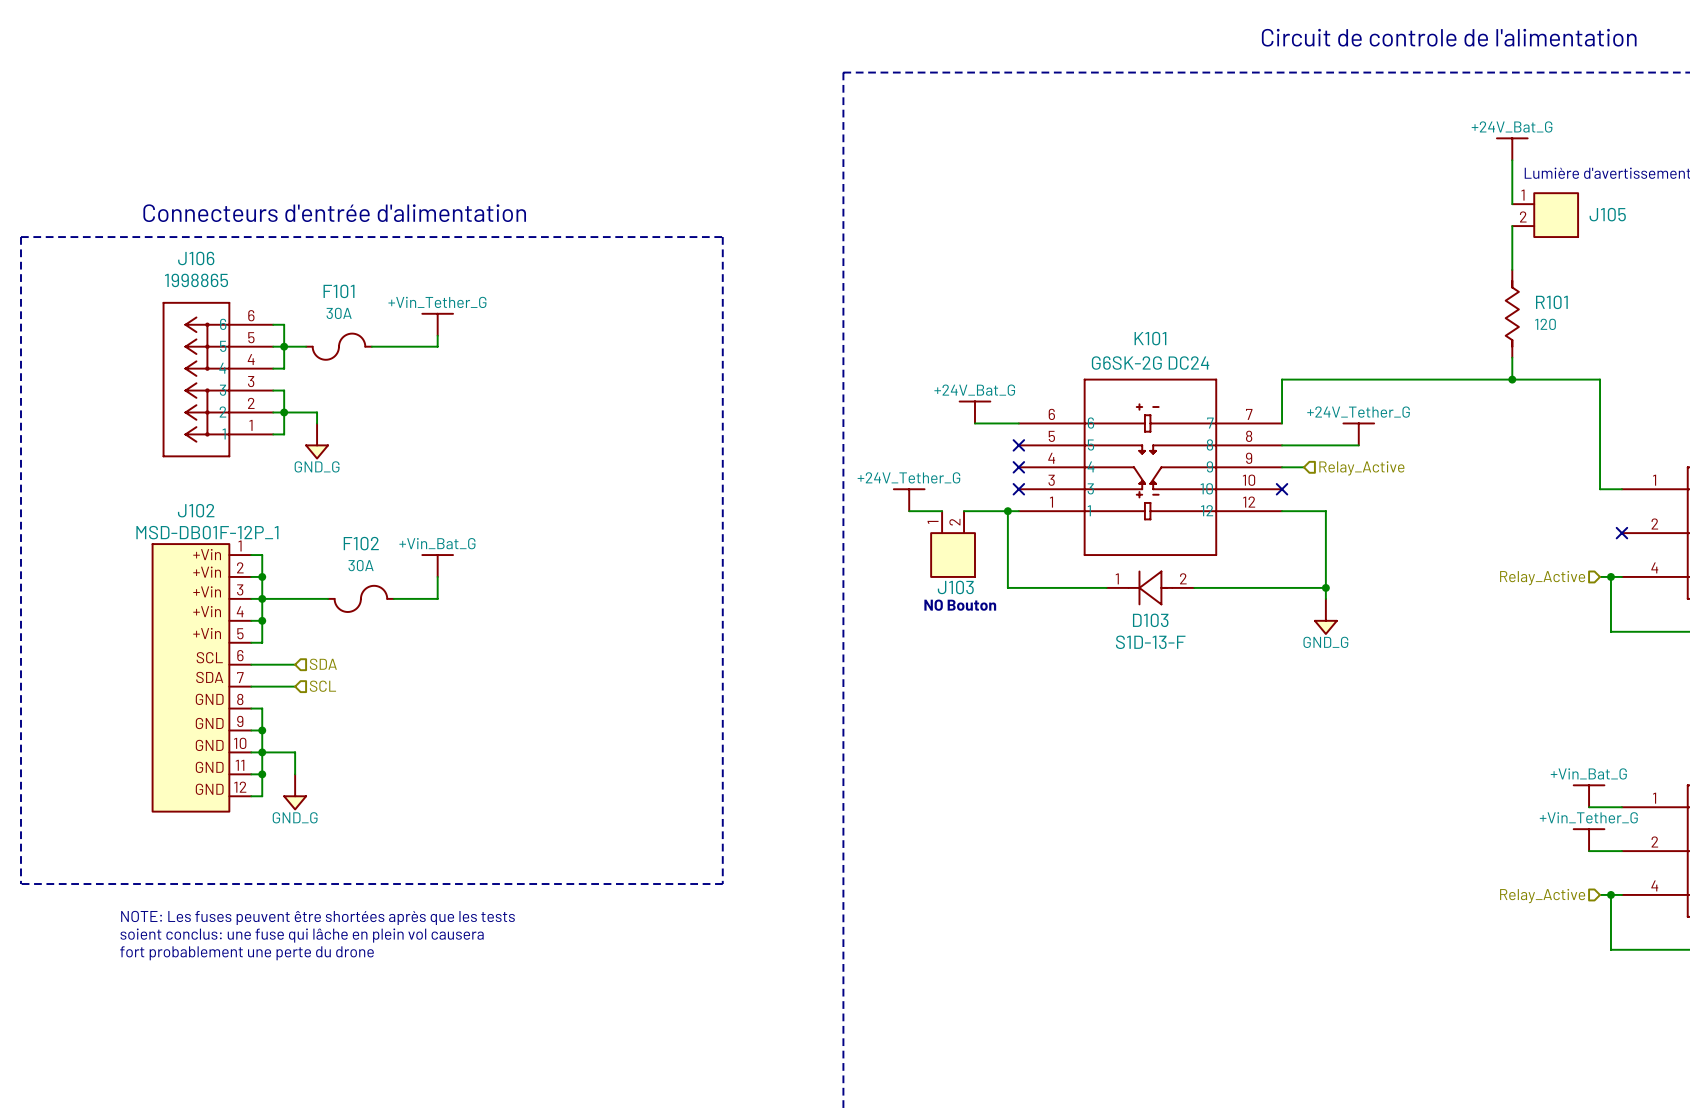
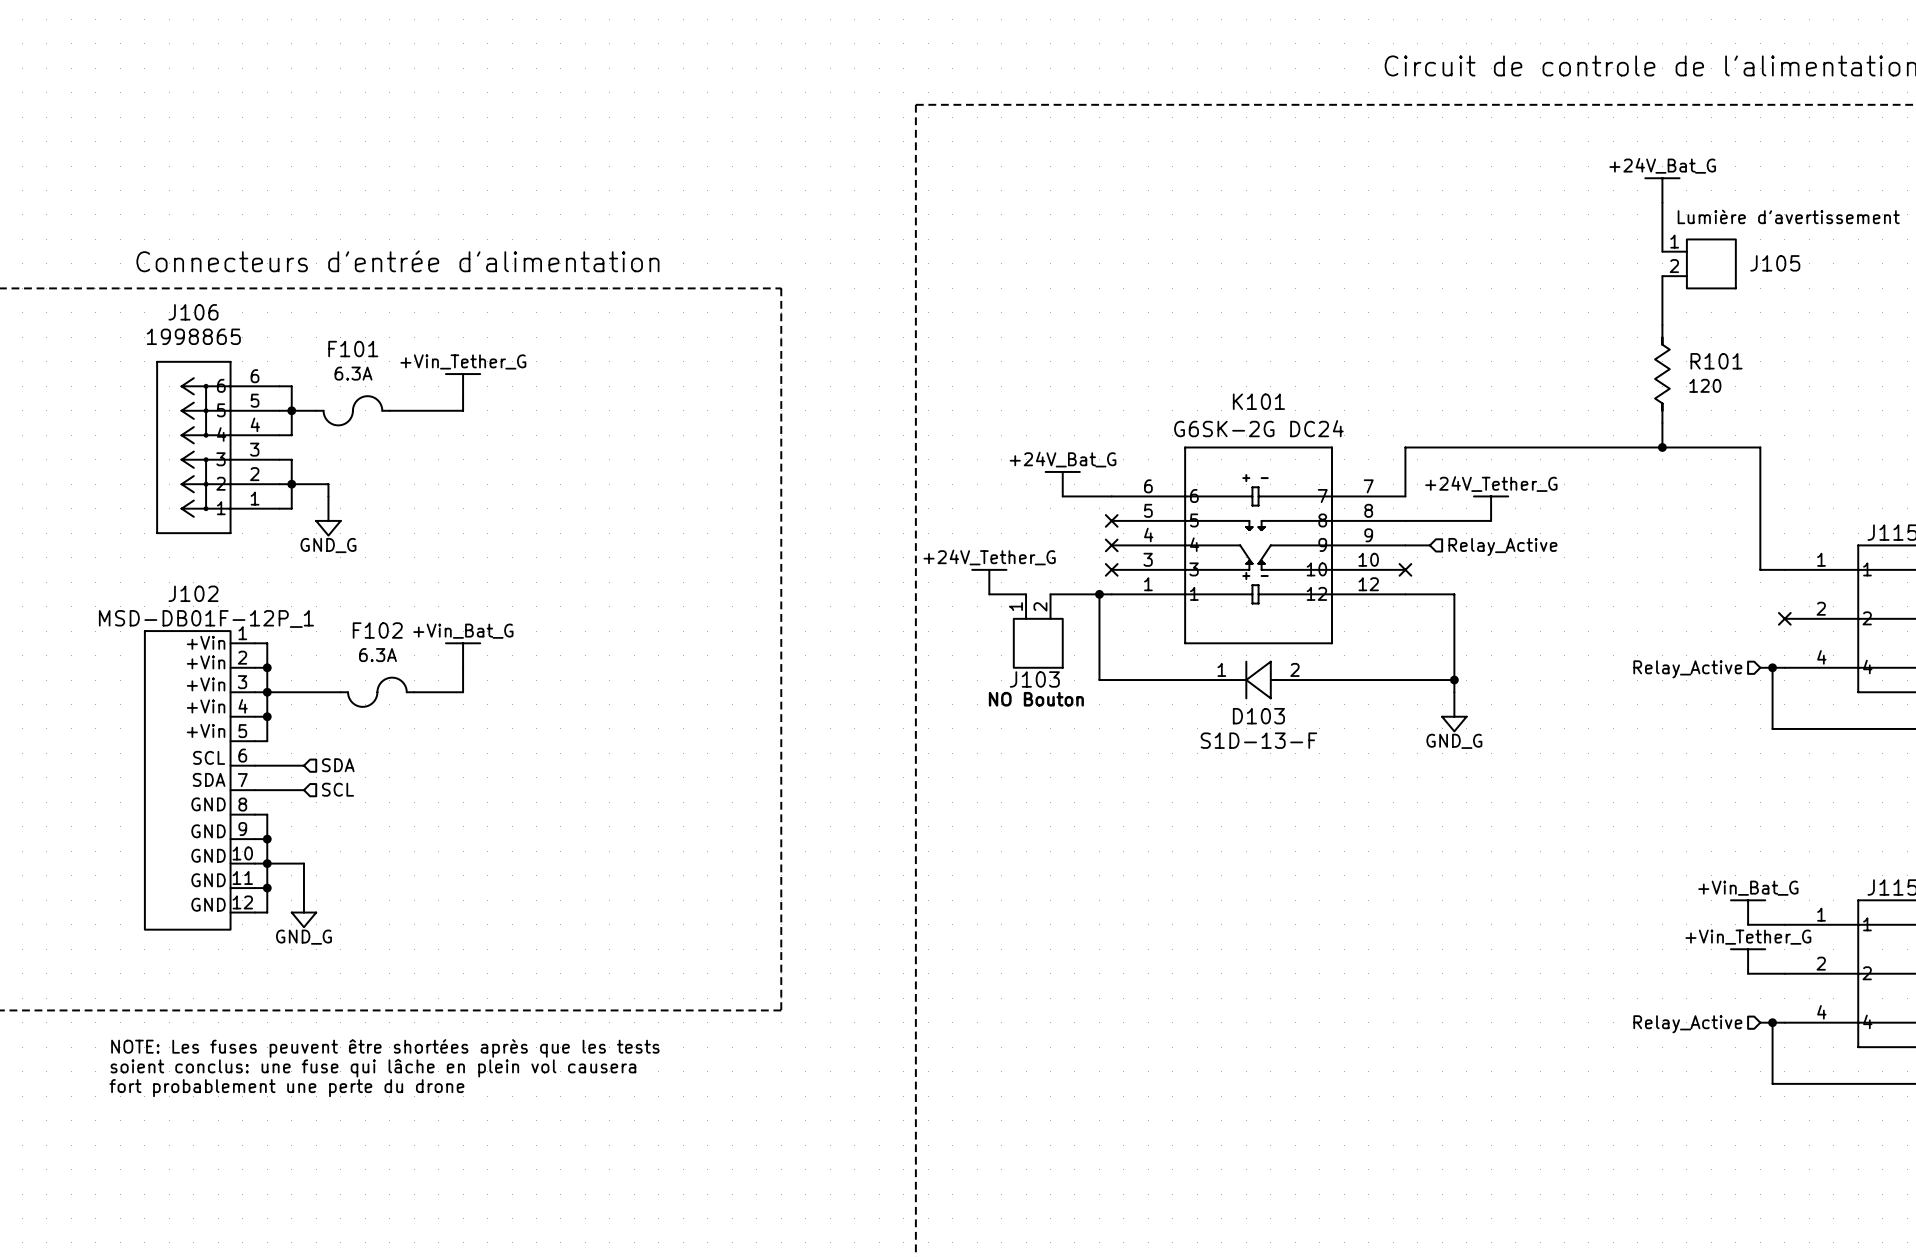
F101 text: 30A (339, 313) -> 6.3A (353, 373)
F102 text: 30A (361, 565) -> 6.3A (377, 655)

